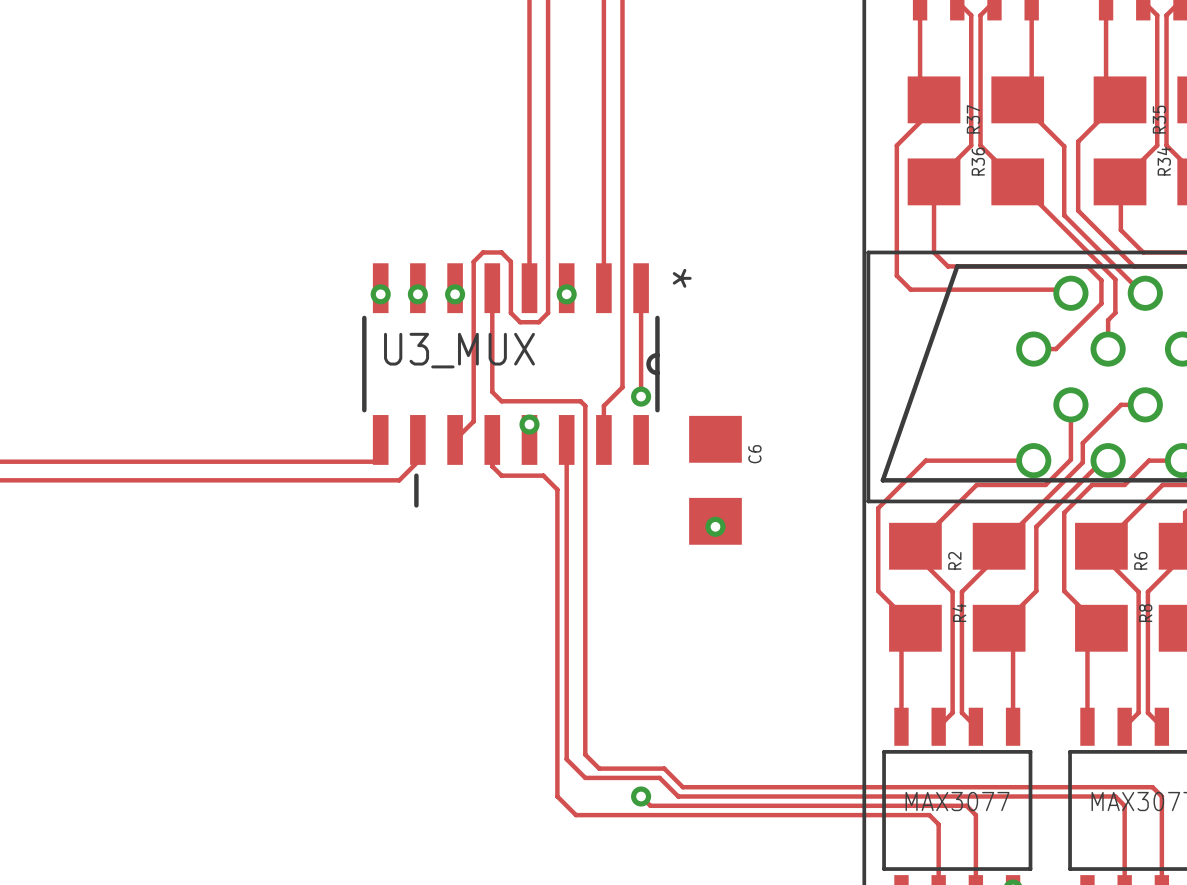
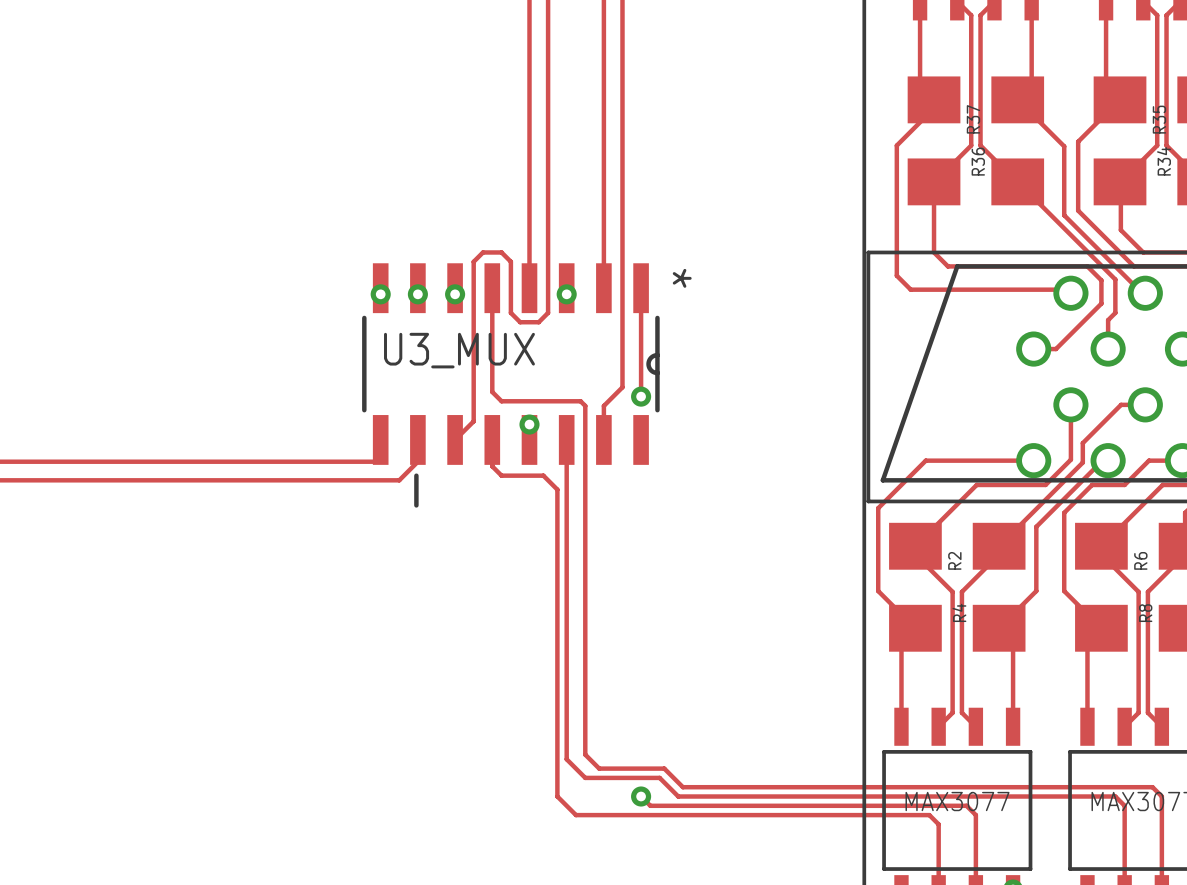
C6: (715, 480) -> none
via: (715, 526) -> none

